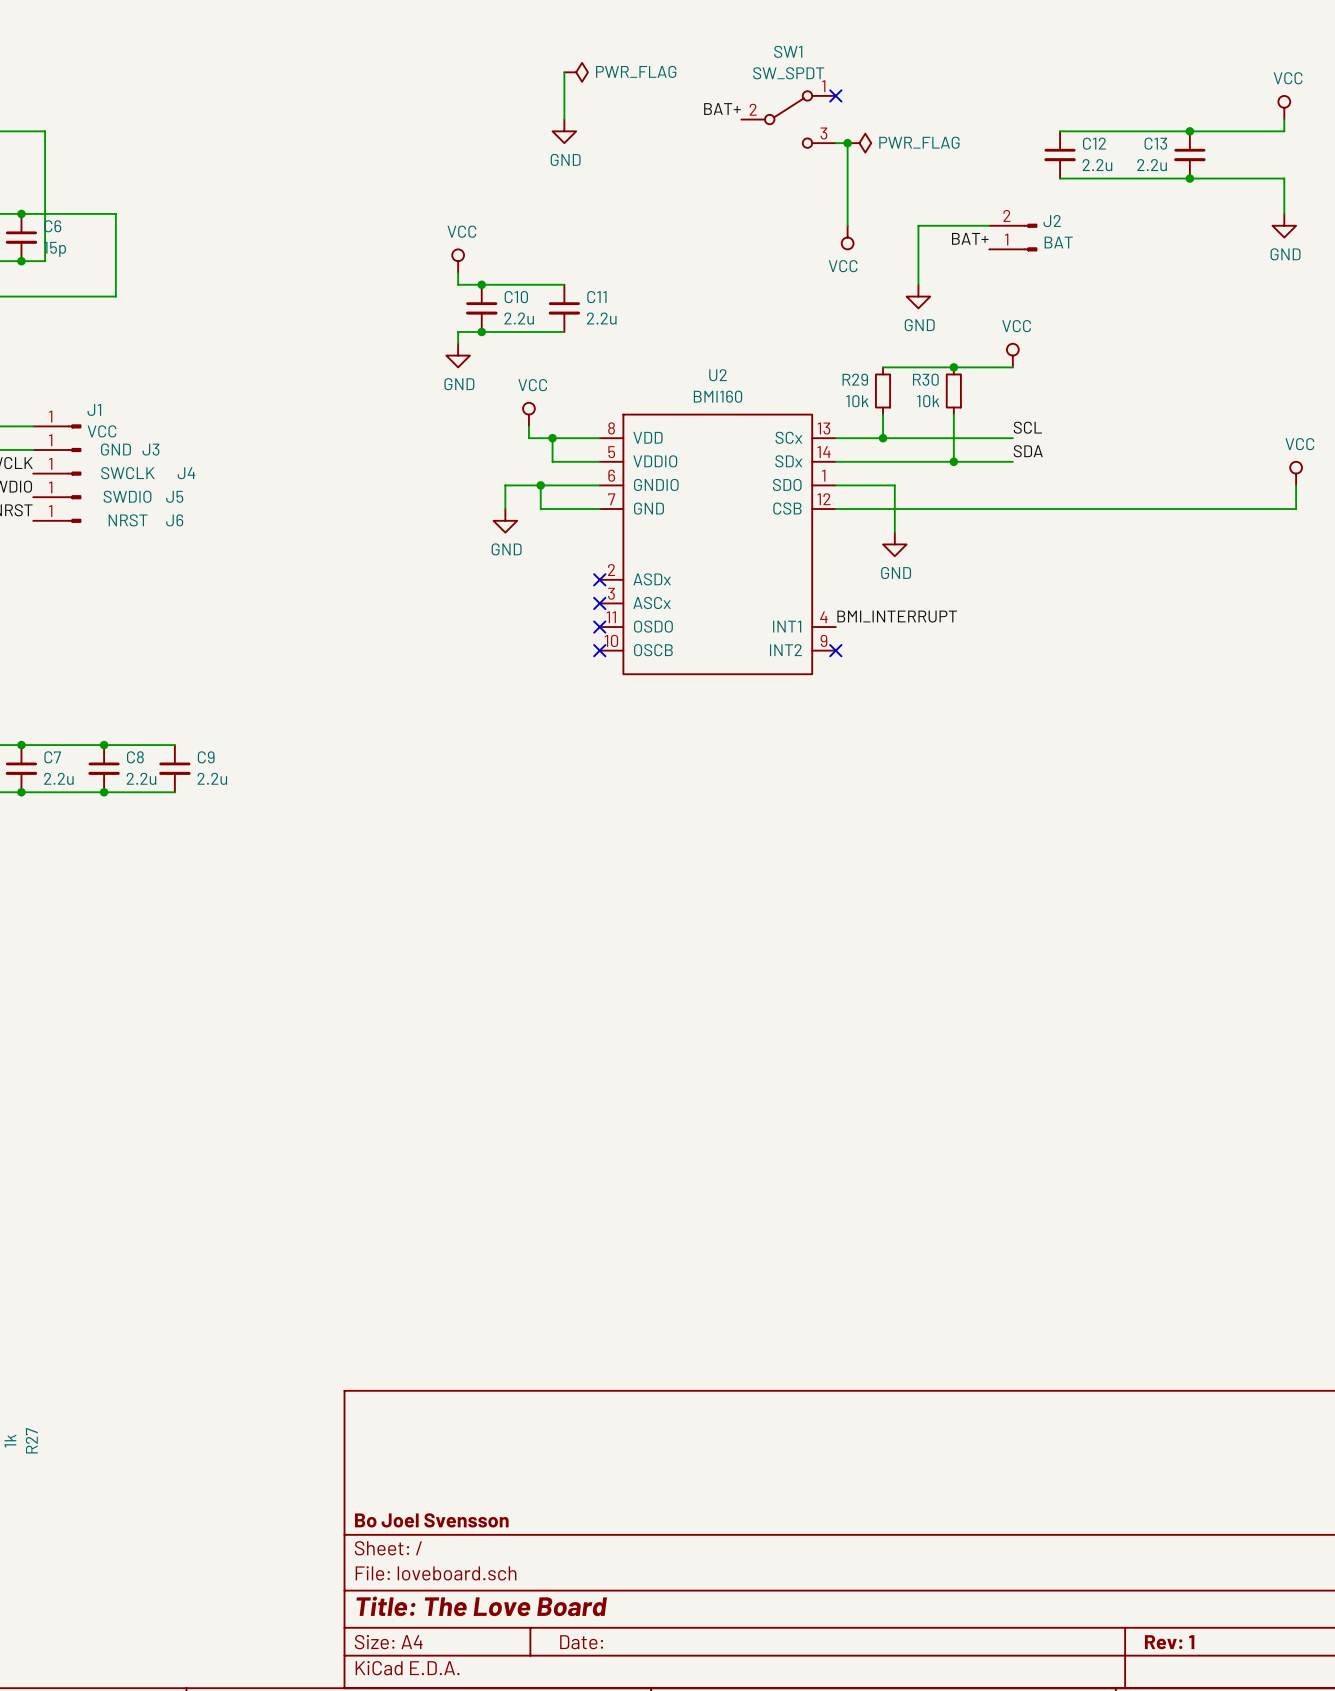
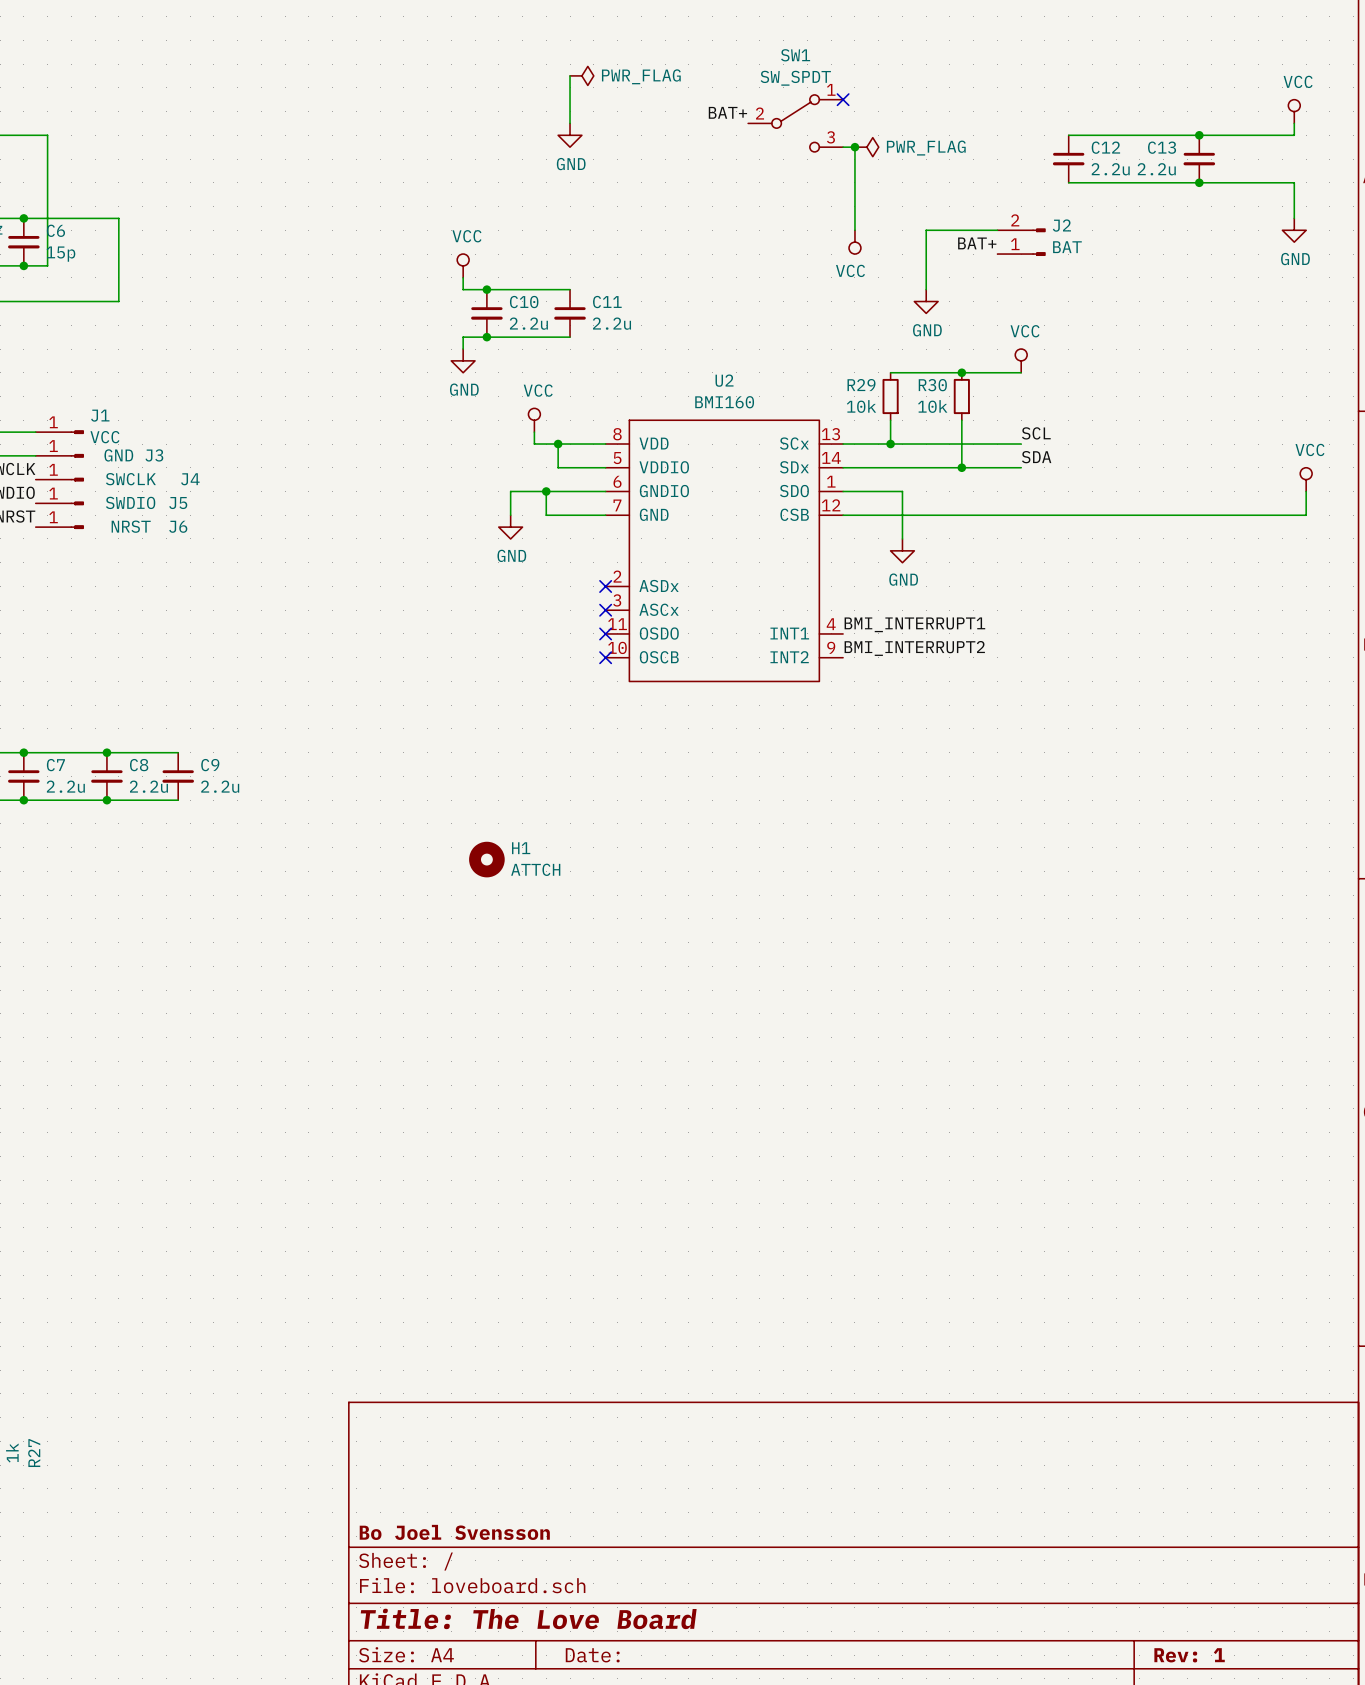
label: BMI_INTERRUPT (897, 616) -> BMI_INTERRUPT1 (914, 624)
label: none -> BMI_INTERRUPT2 (914, 648)
no-connect mark: (835, 650) -> none
H1: none -> ATTCH (486, 859)

